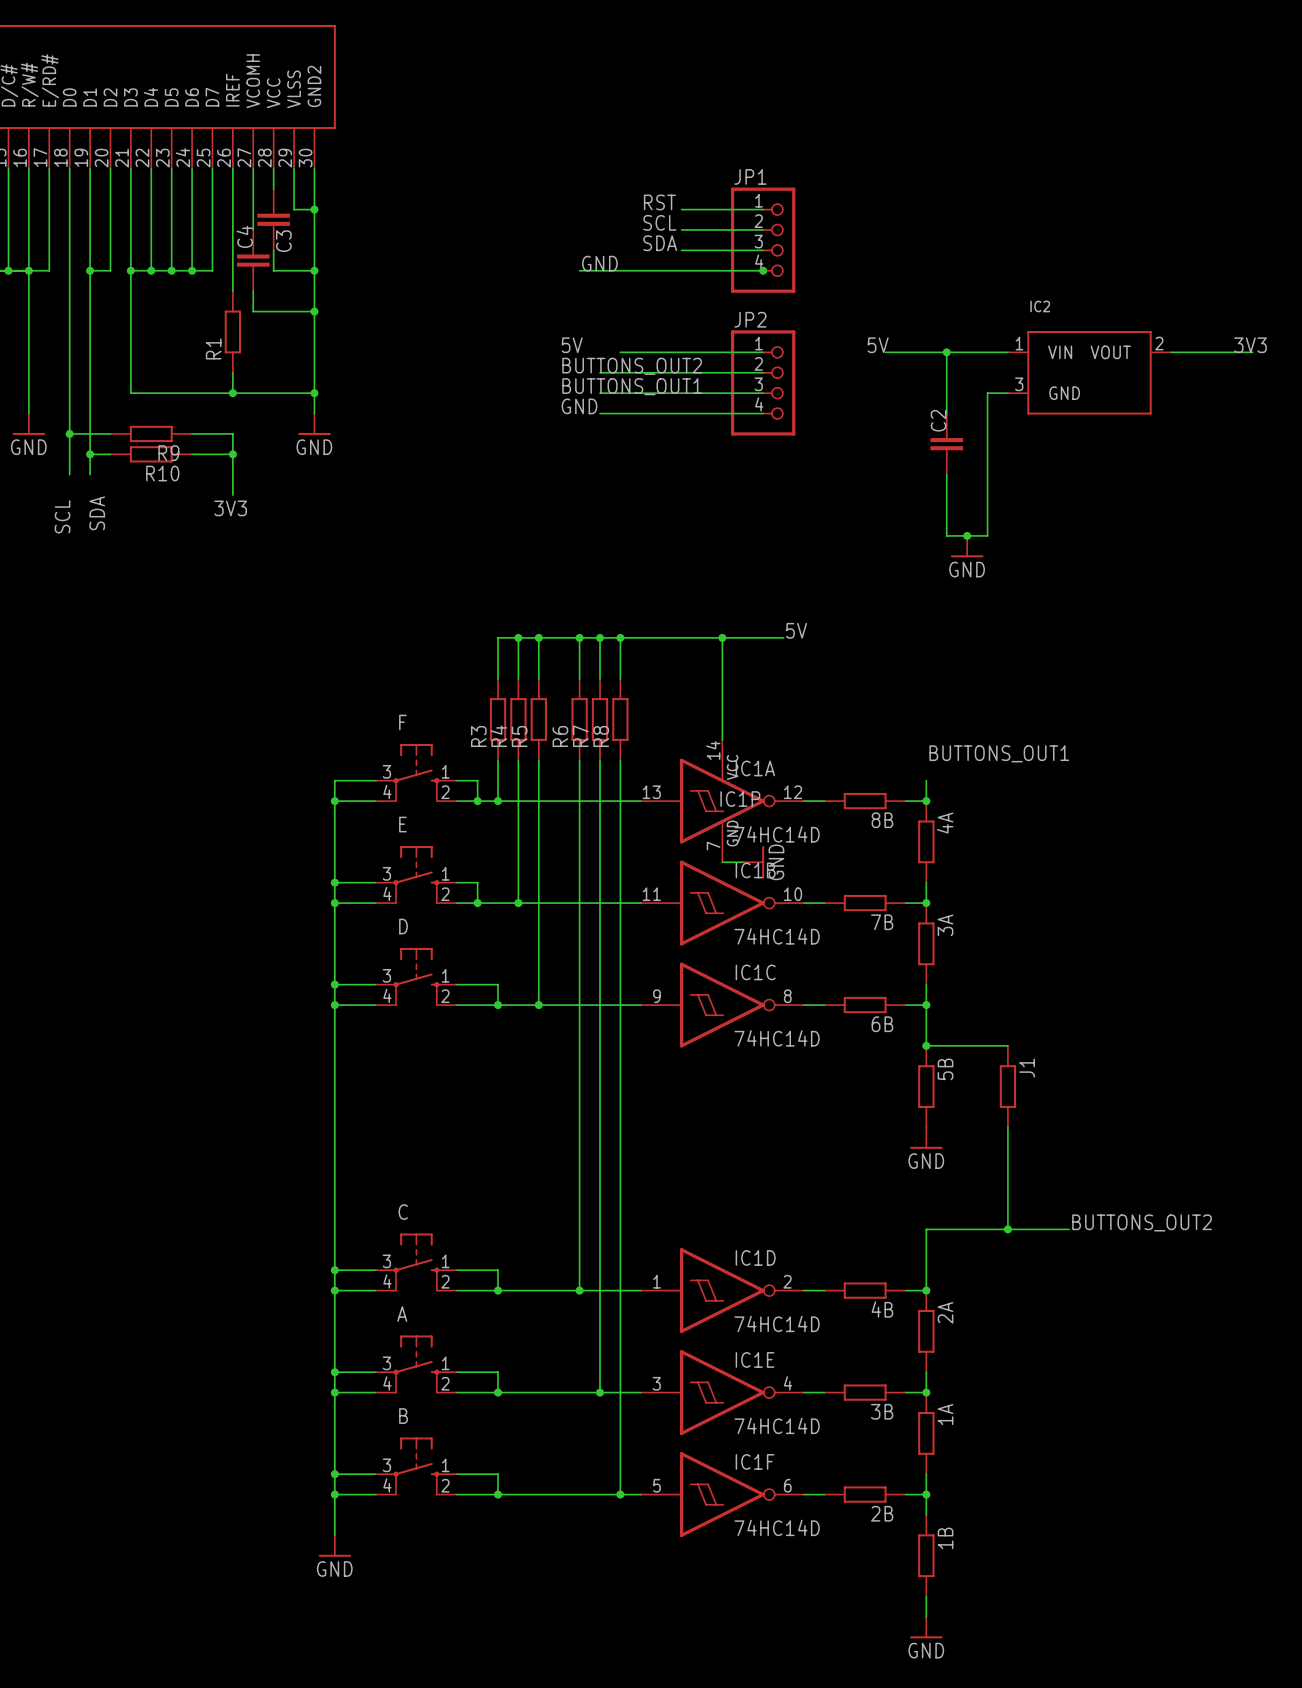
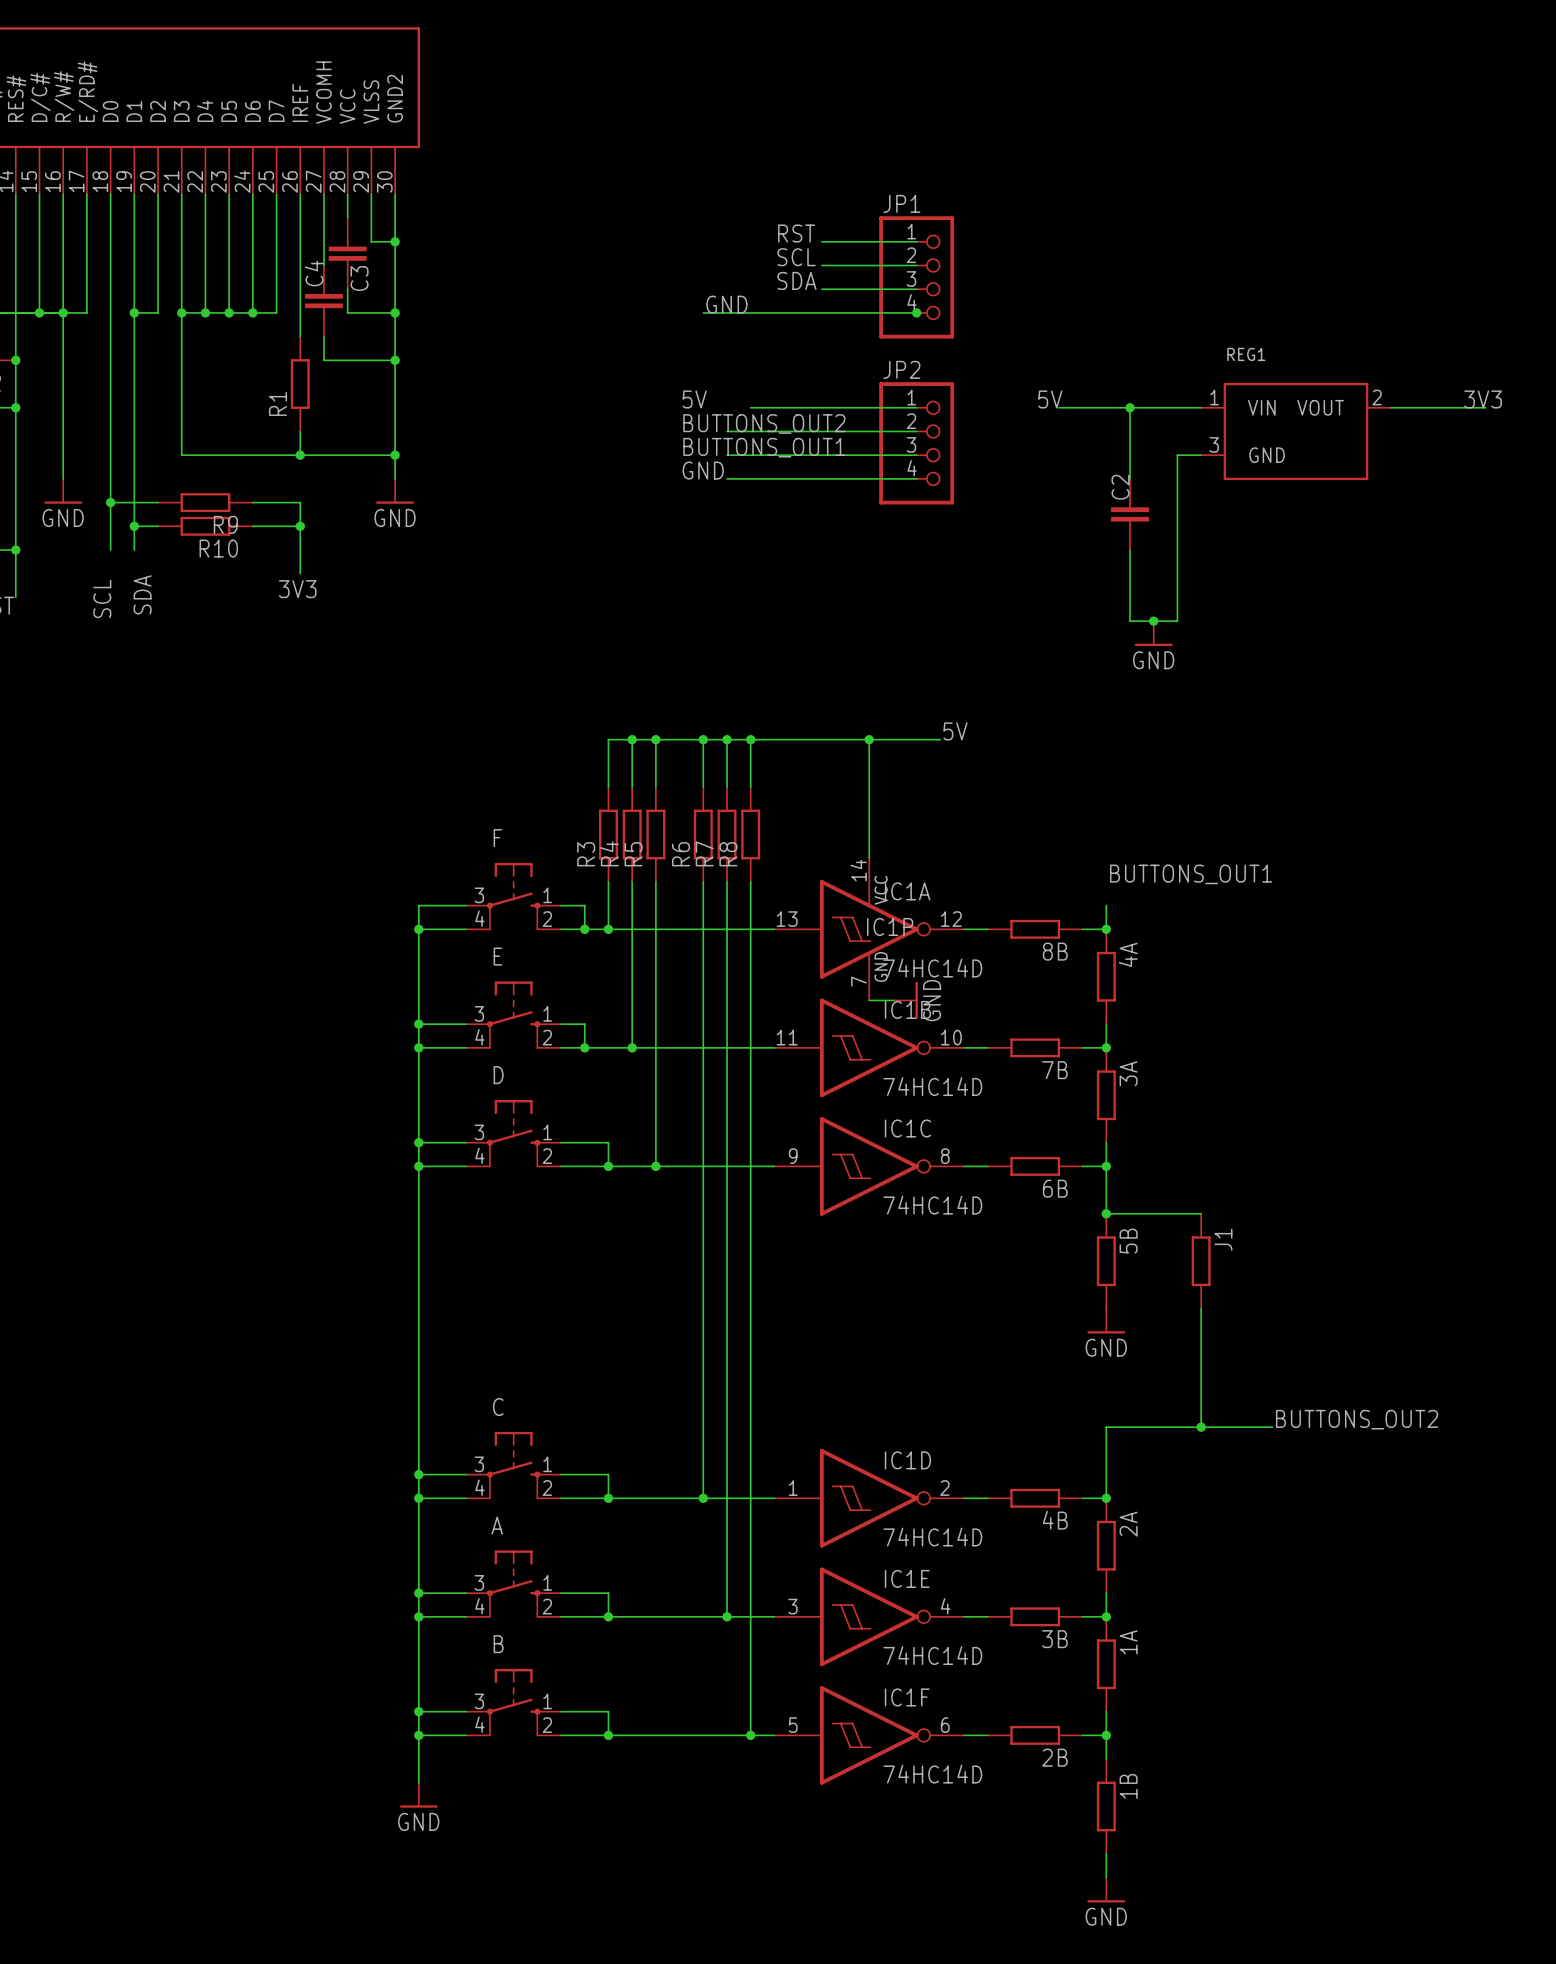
IC2 name: IC2 (1040, 306) -> REG1 (1246, 354)

